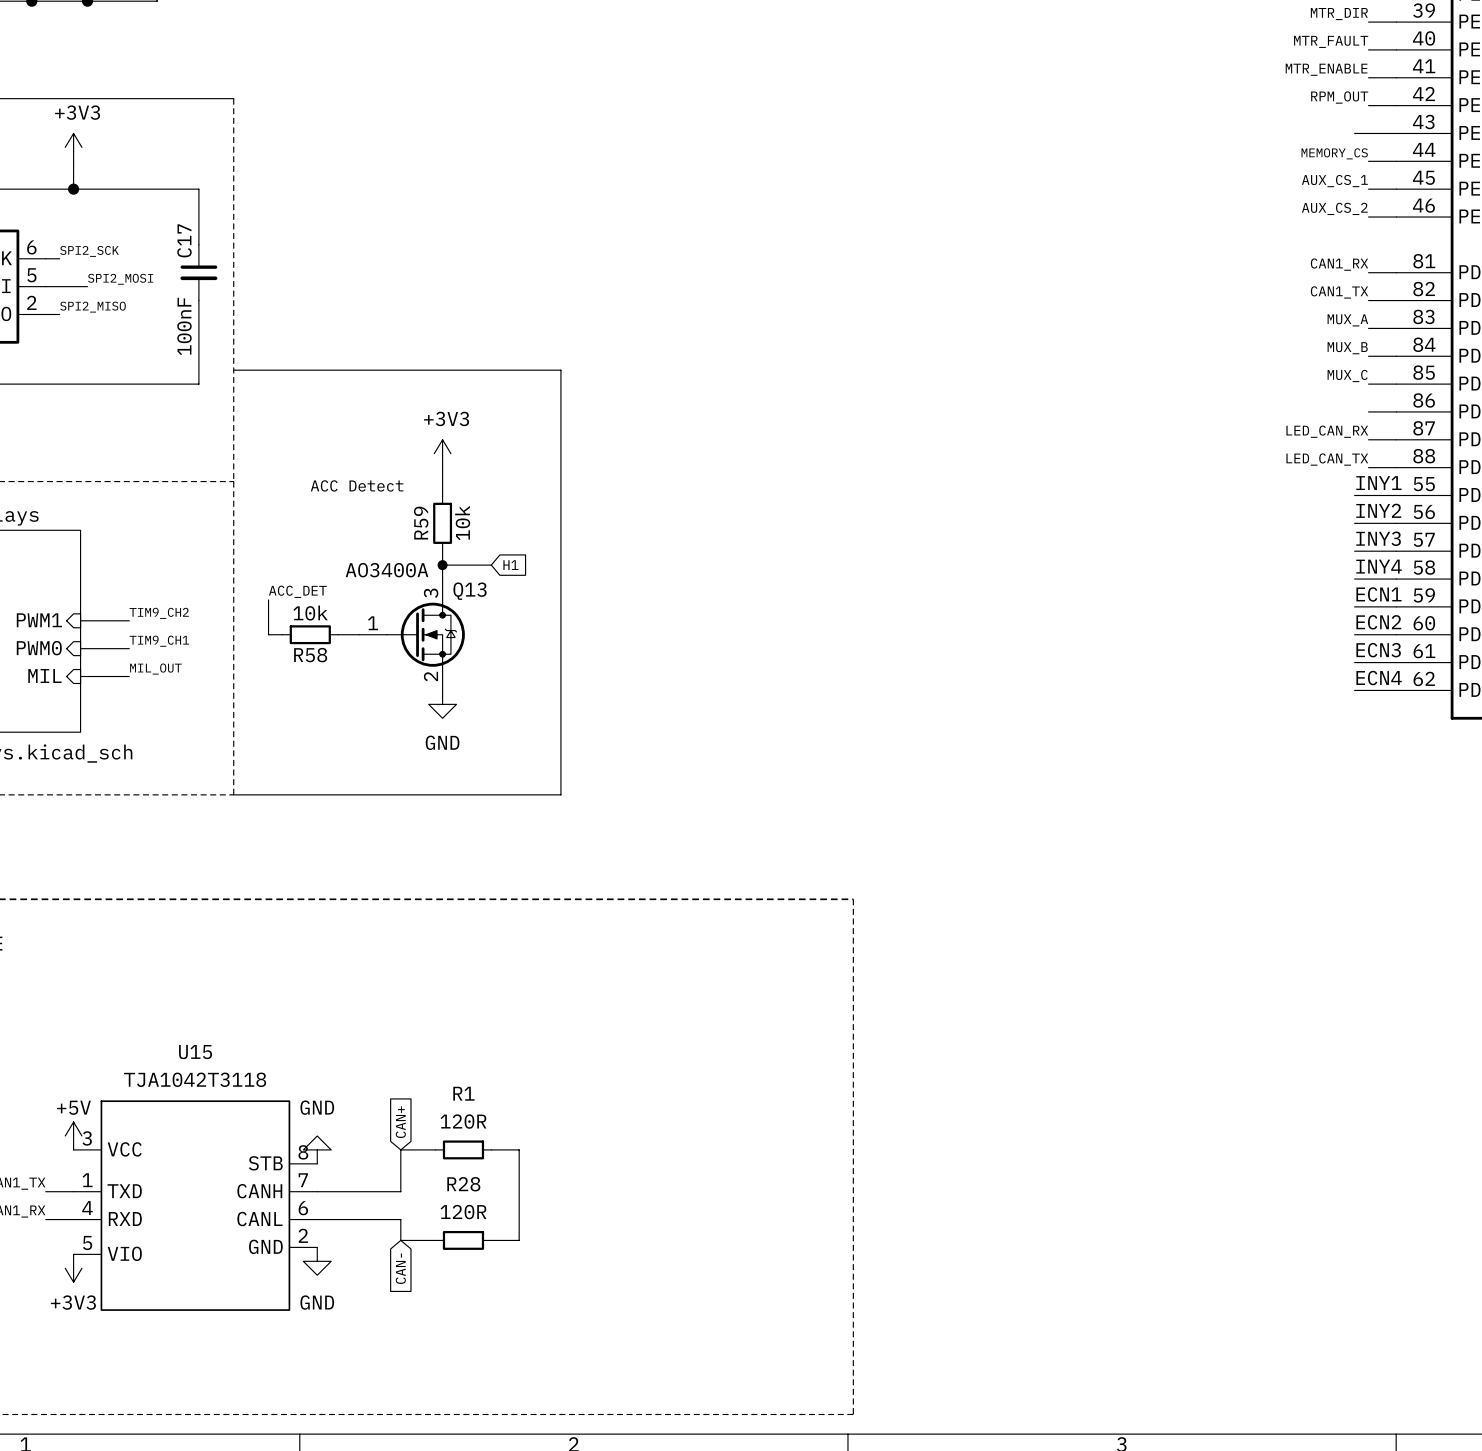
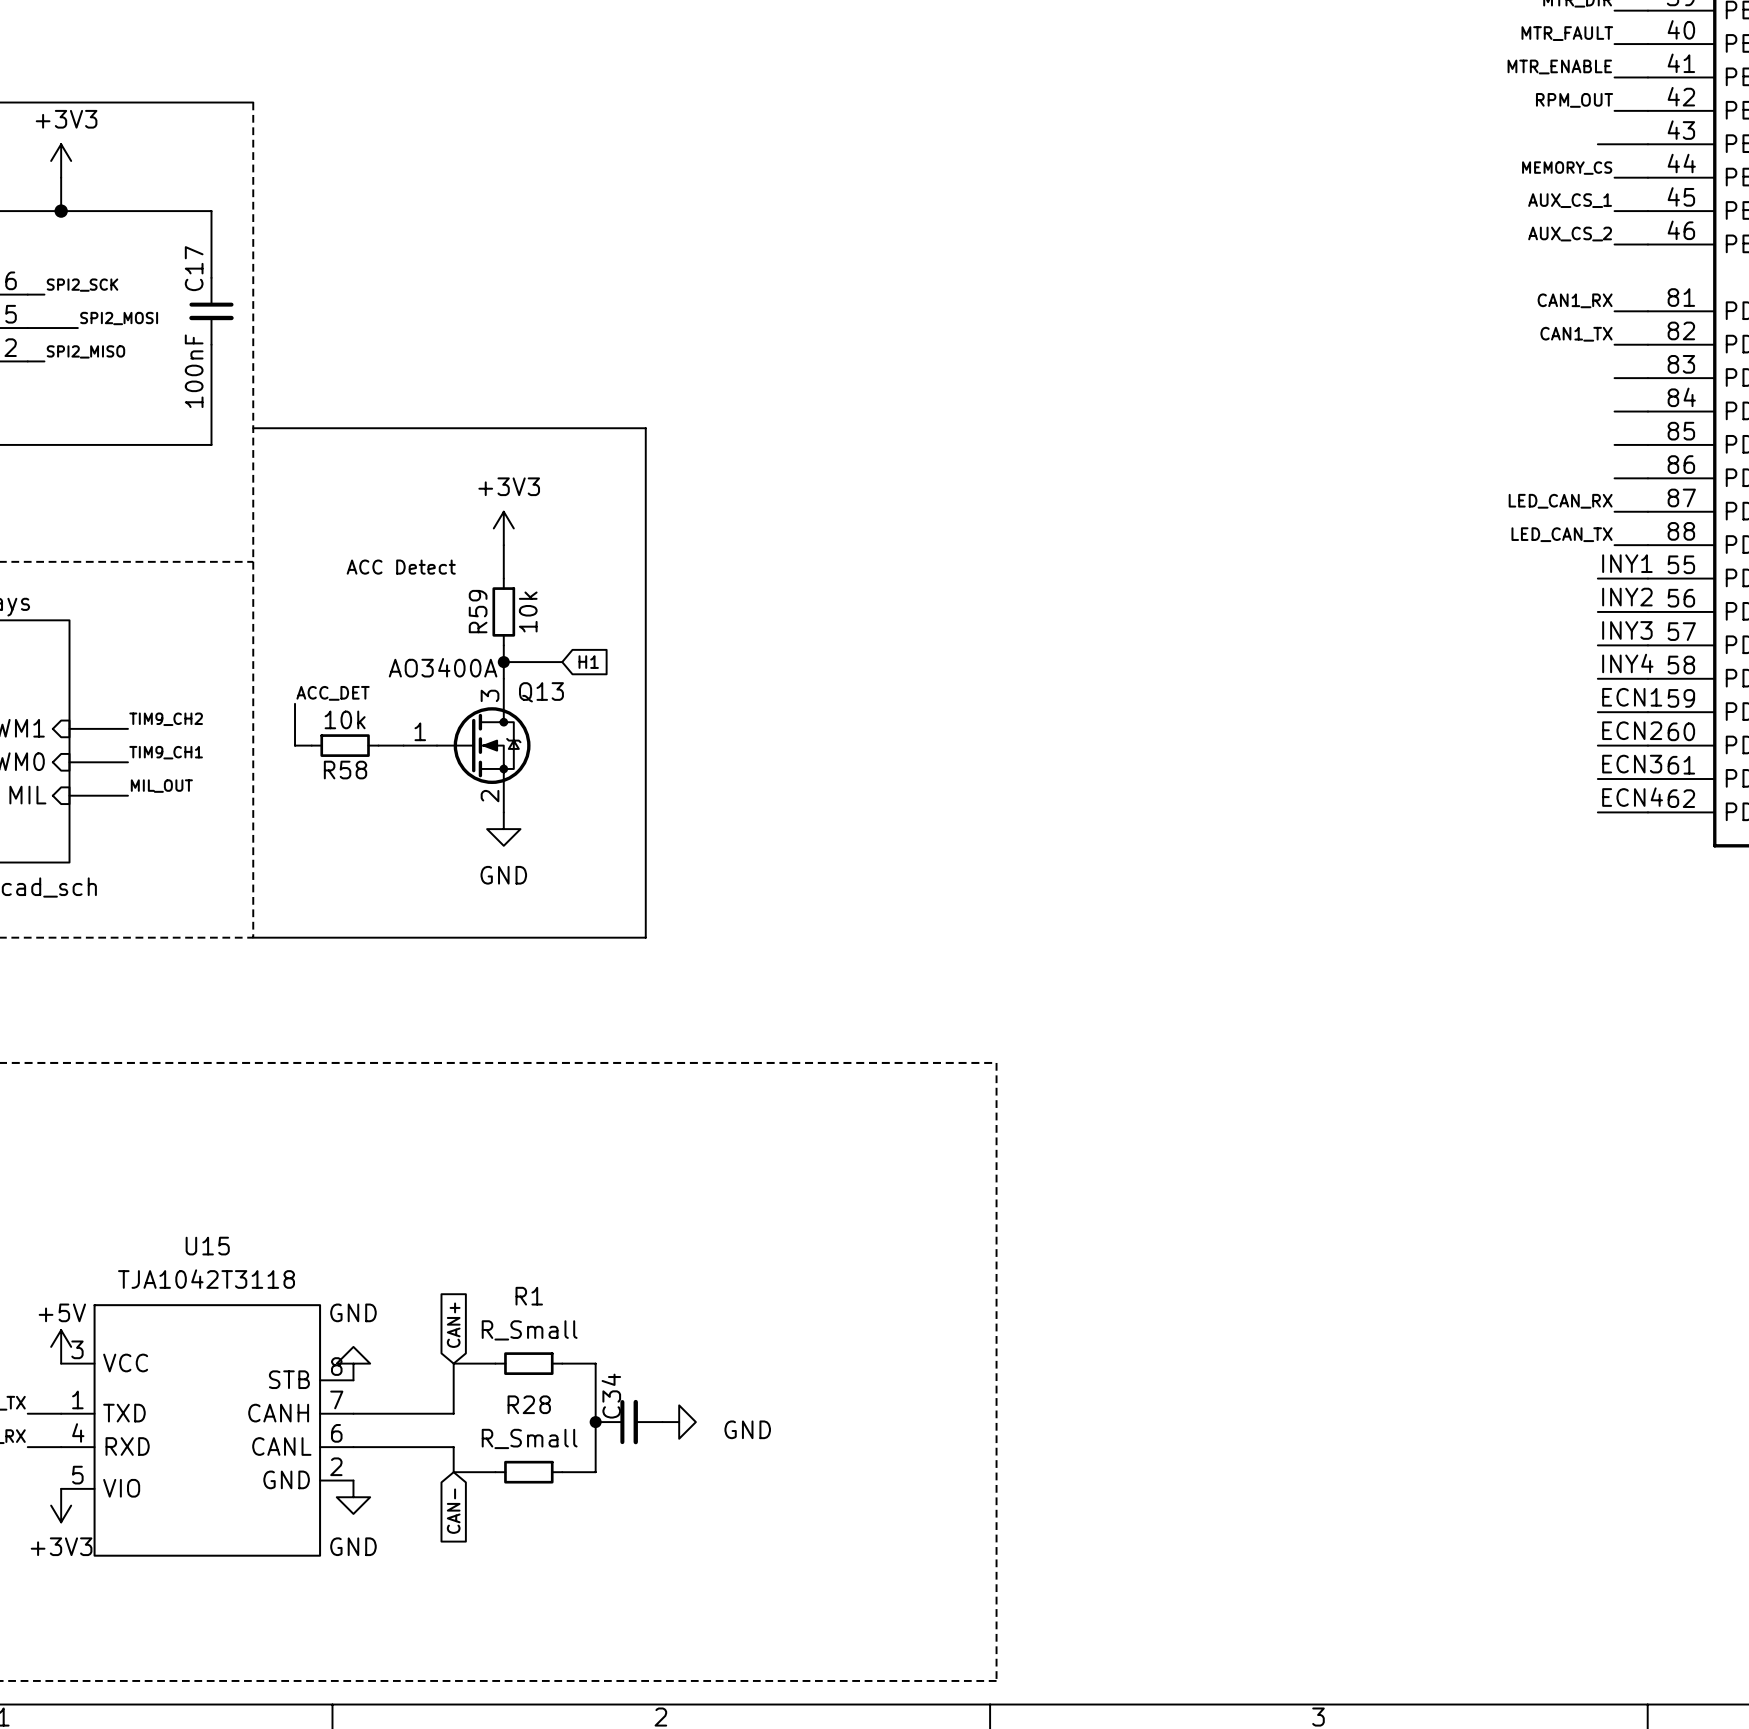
label: MUX_A (1347, 320) -> none
label: MUX_B (1347, 348) -> none
label: MUX_C (1347, 376) -> none
R1 value: 120R (463, 1121) -> R_Small (529, 1330)
junction: none -> (595, 1422)
C34: none -> (629, 1422)
power symbol: none -> GND (679, 1422)
R28 value: 120R (463, 1212) -> R_Small (529, 1438)

